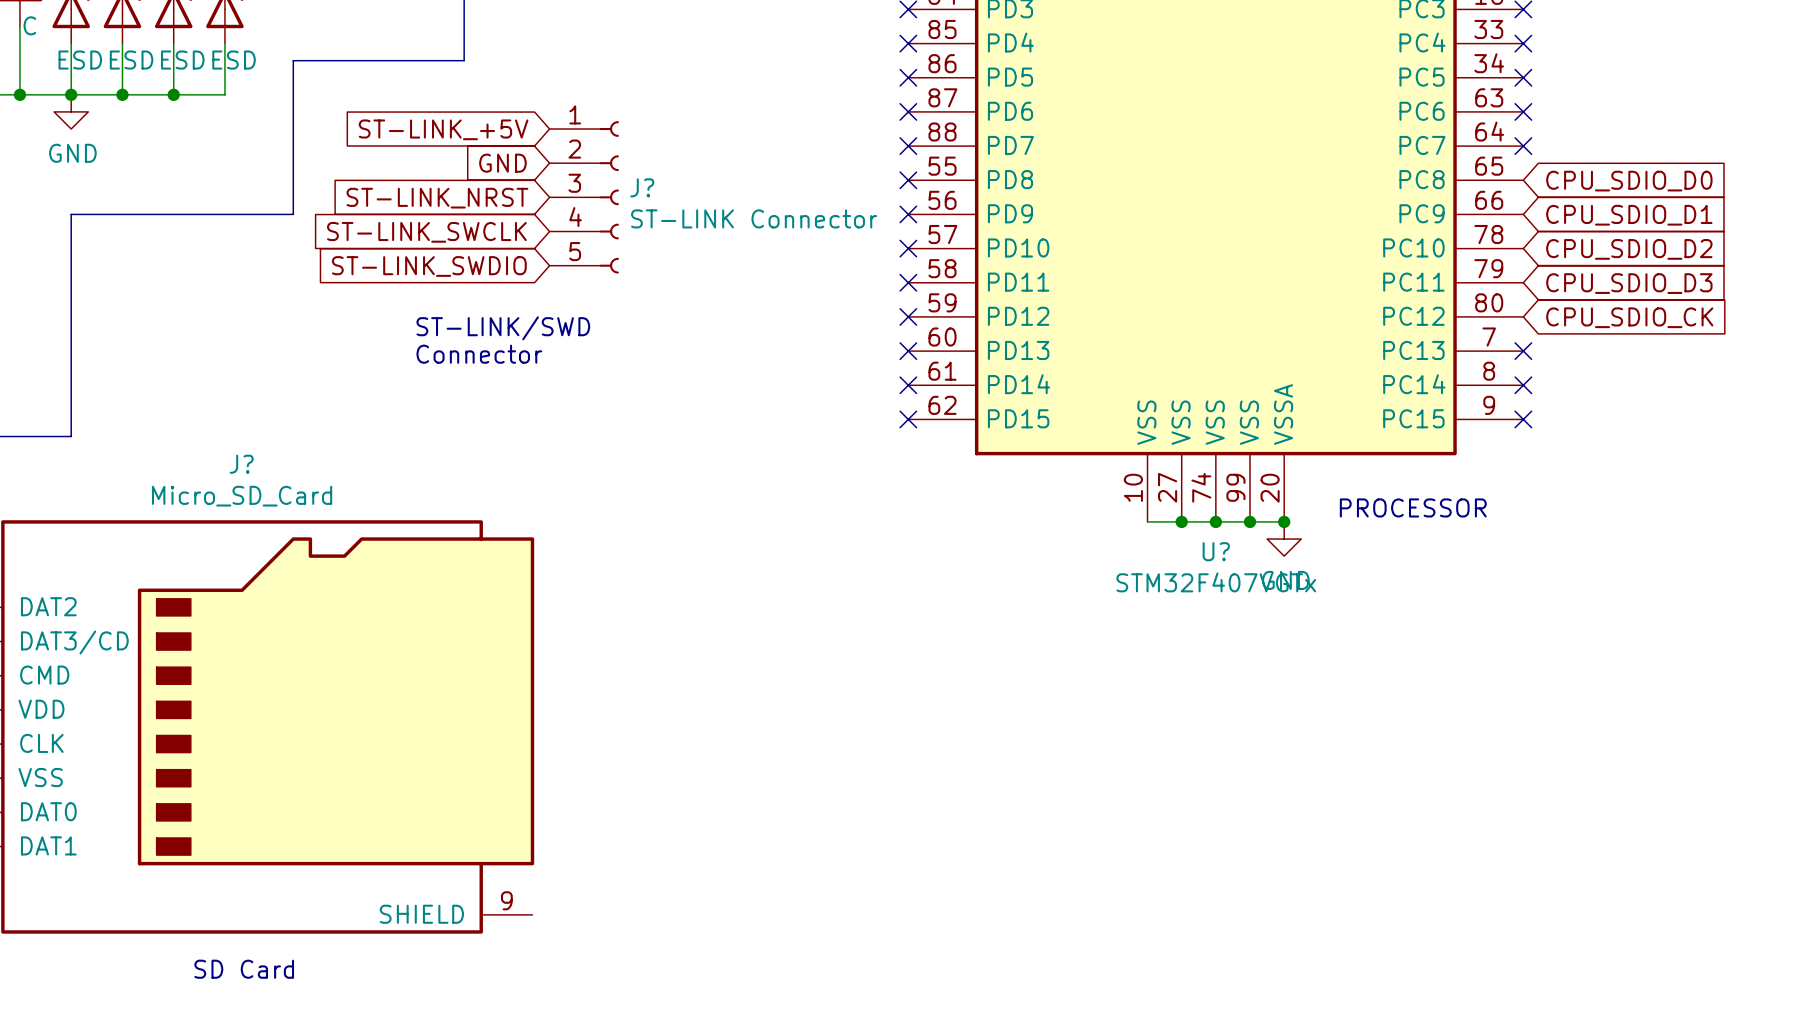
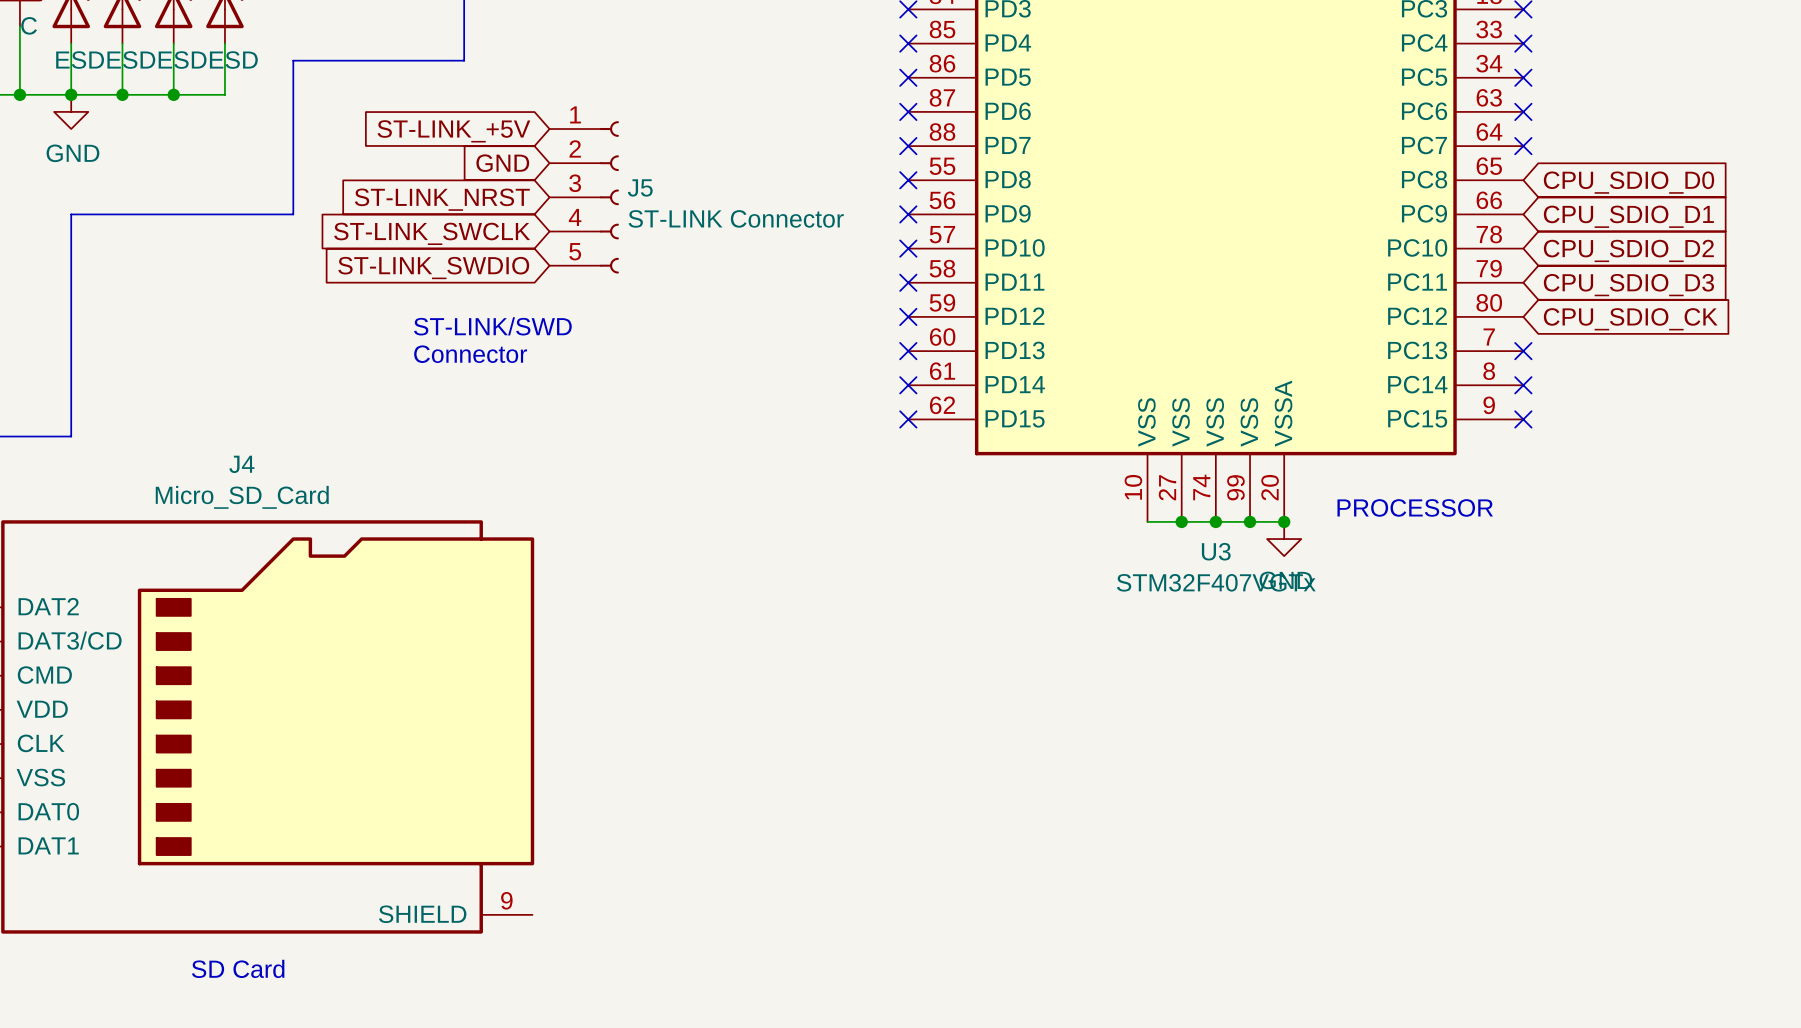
J? name: J? (642, 187) -> J5 (640, 187)
J? name: J? (241, 464) -> J4 (241, 464)
U? name: U? (1216, 551) -> U3 (1216, 551)

